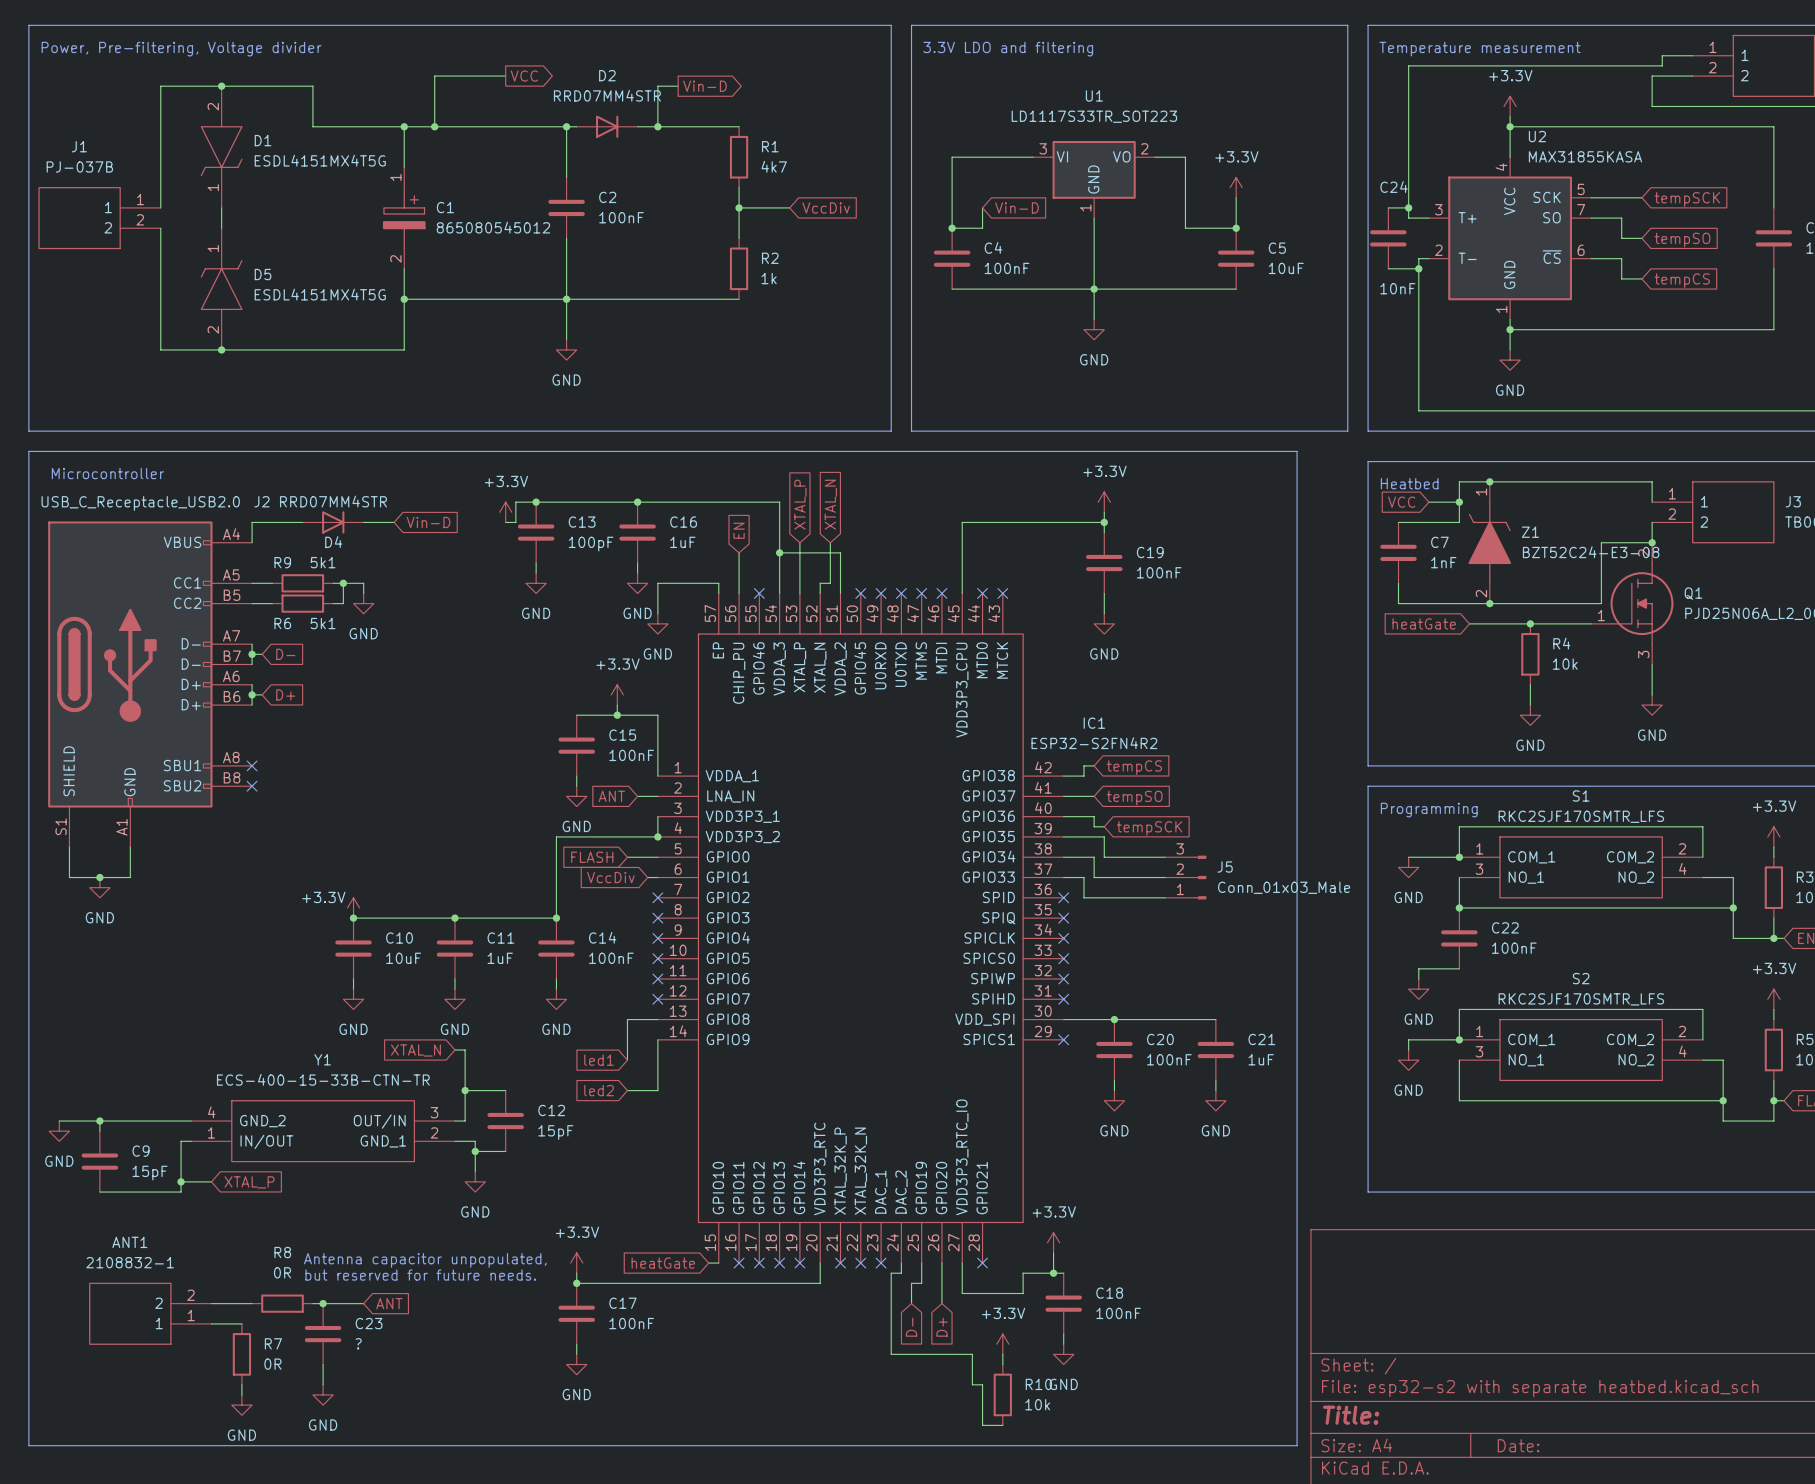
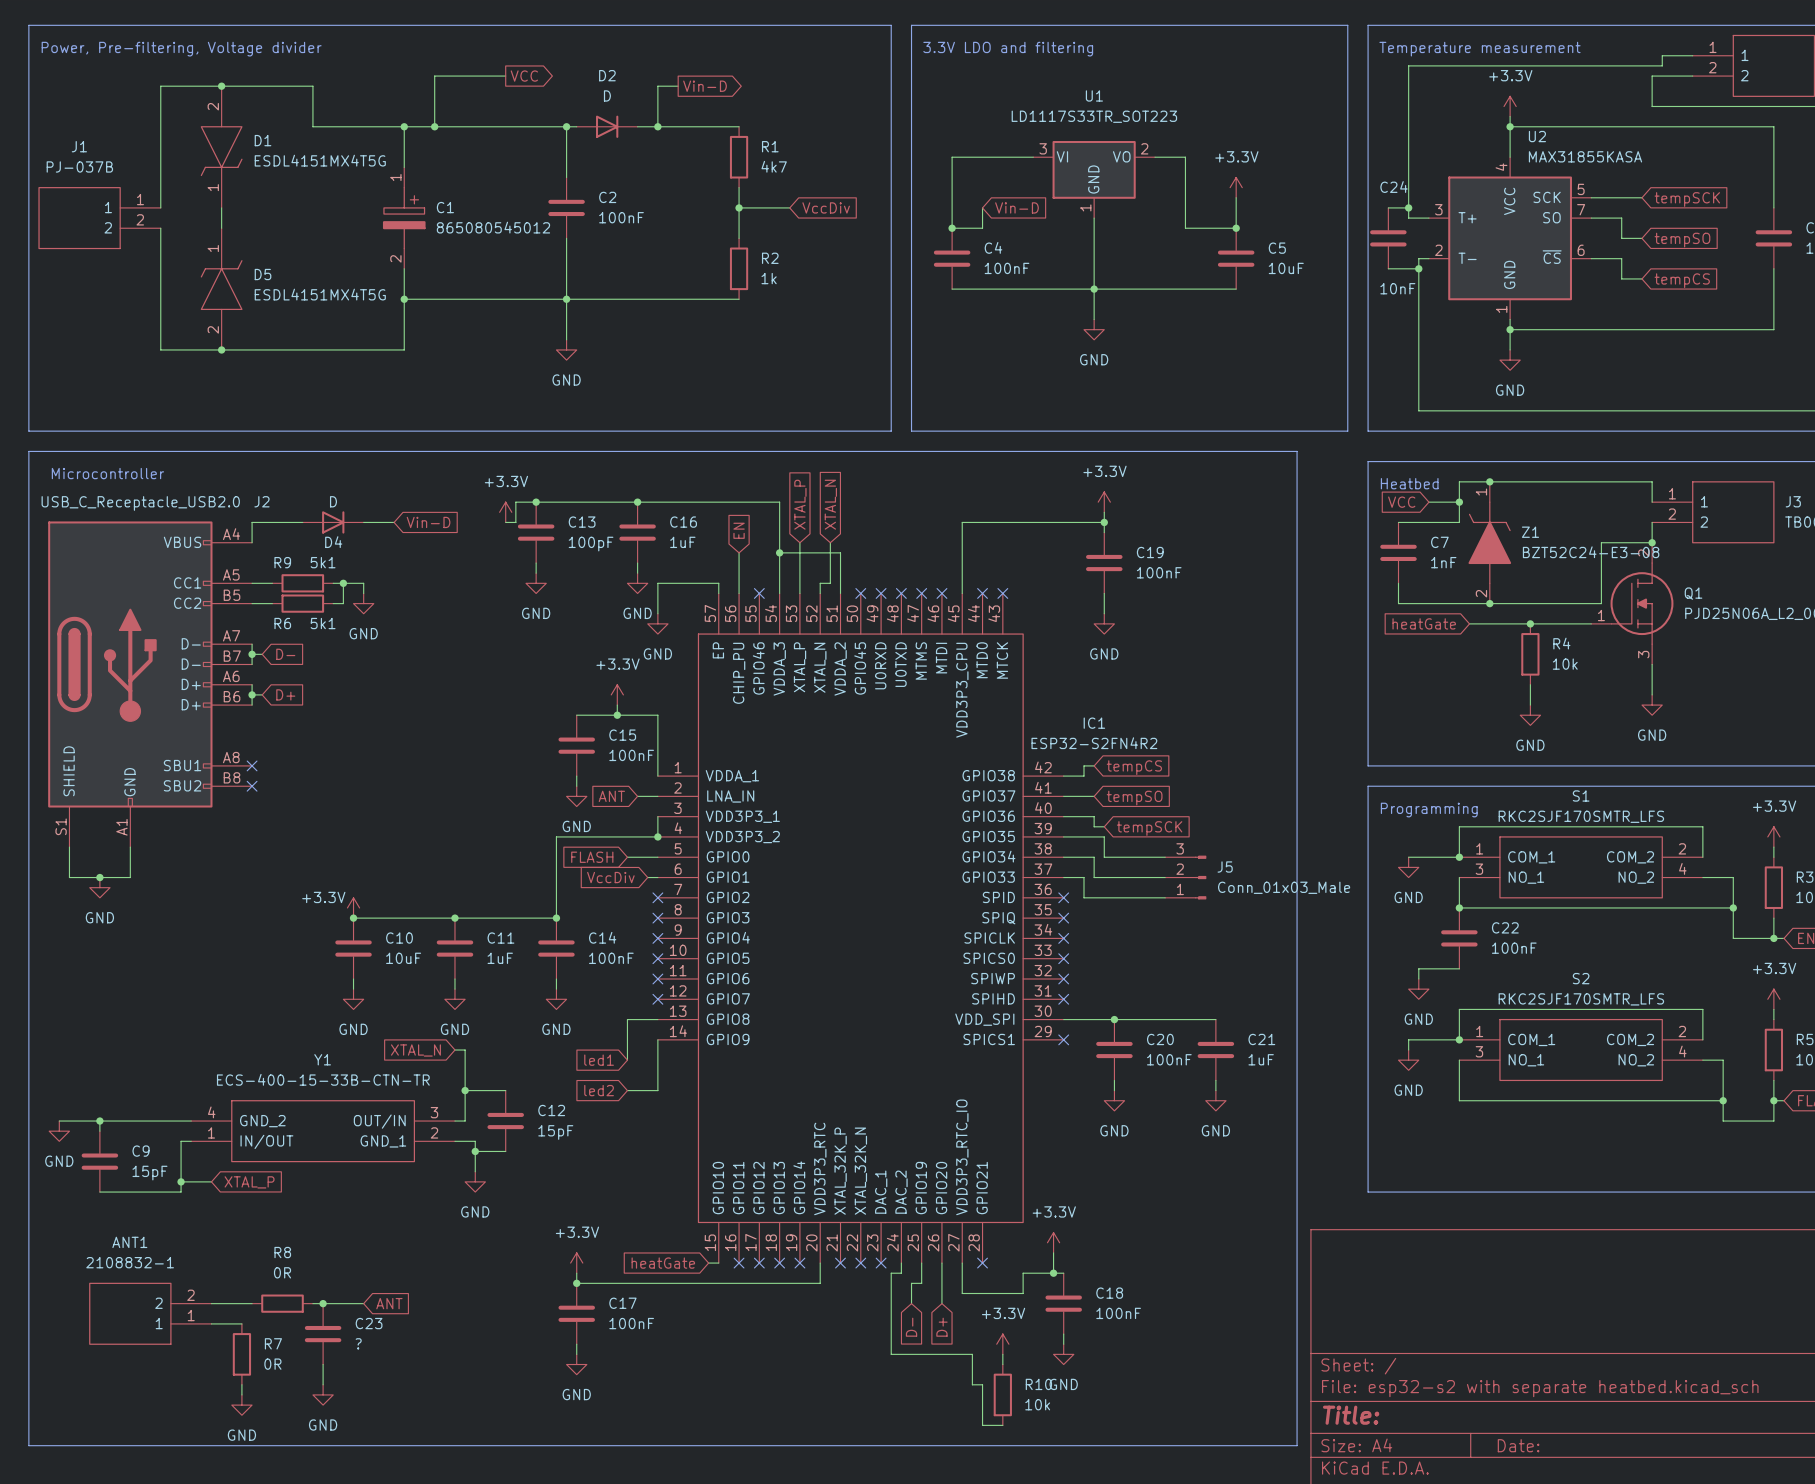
D2 value: RRD07MM4STR (607, 95) -> D (607, 95)
D4 value: RRD07MM4STR (333, 501) -> D (333, 501)
text: Antenna capacitor unpopulated, (425, 1260) -> none
text: but reserved for future needs. (420, 1275) -> none

